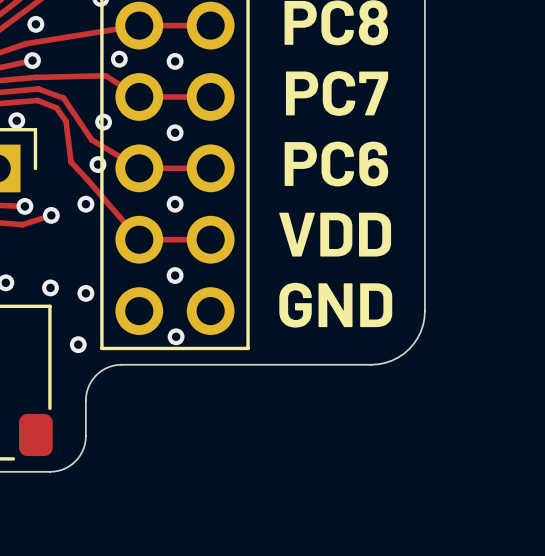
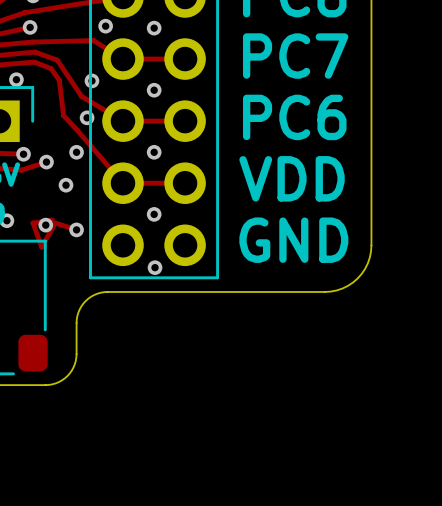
via: none -> (66, 185)
track: none -> (52, 219) (33, 223) (41, 247) (55, 223) (76, 229)
via: (78, 344) -> none

